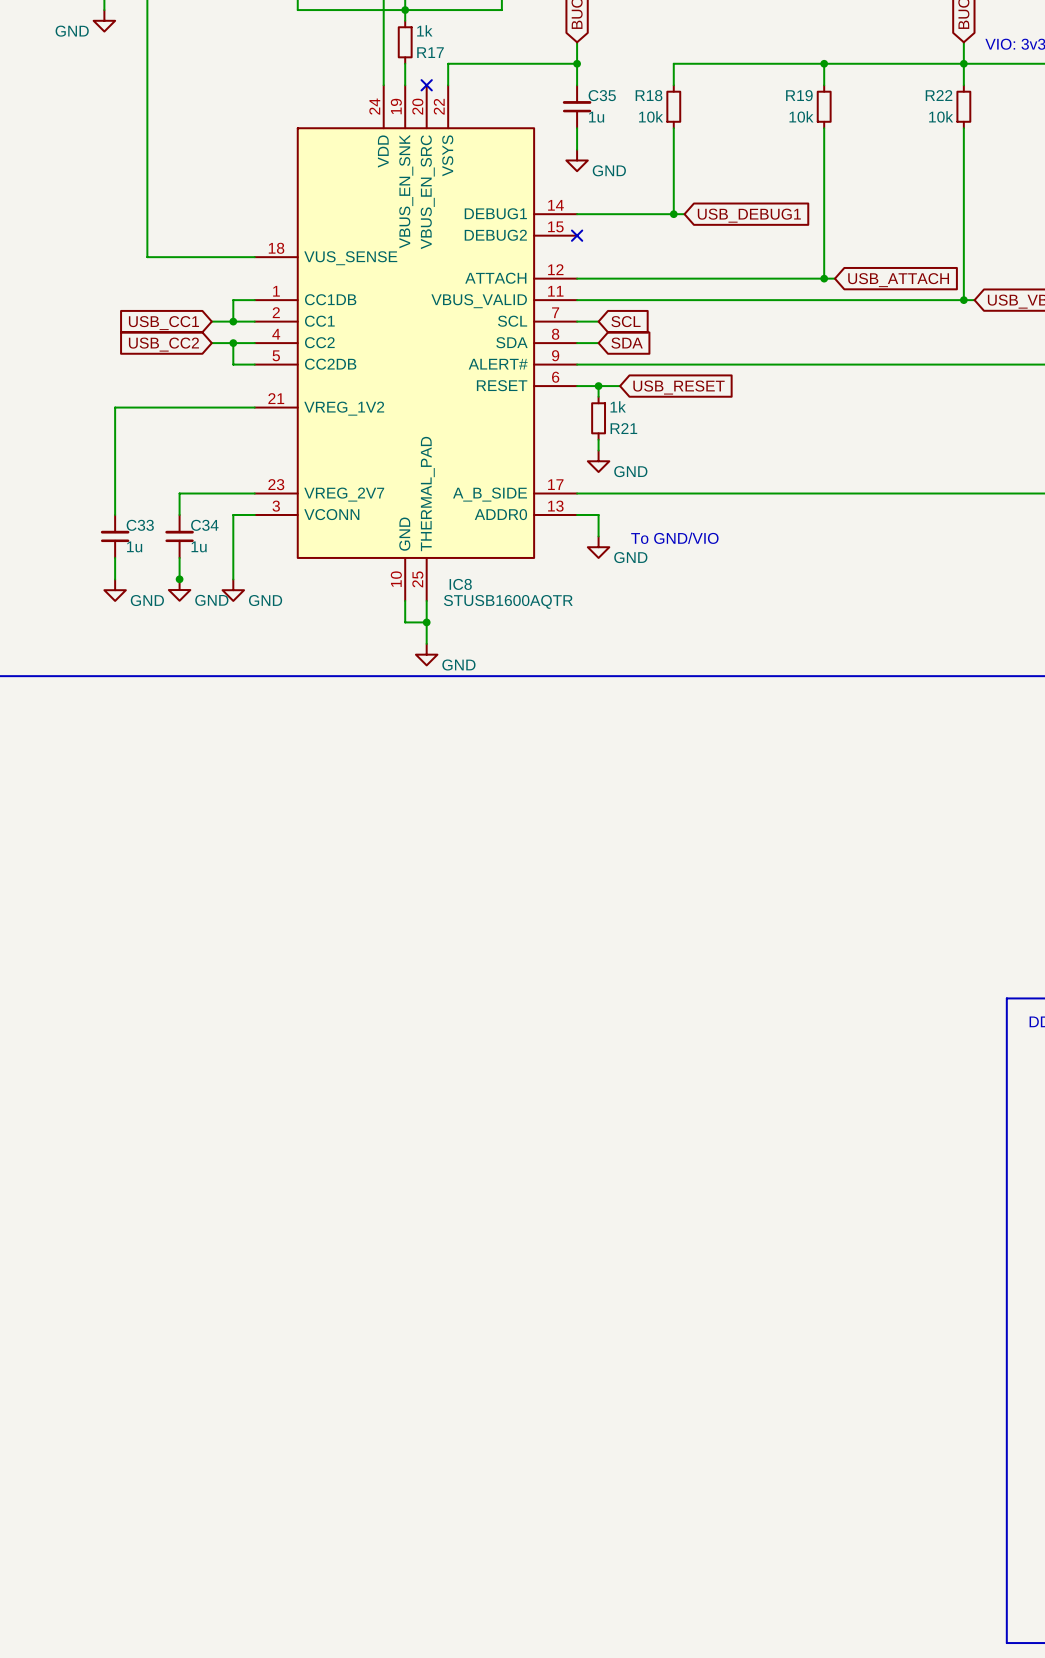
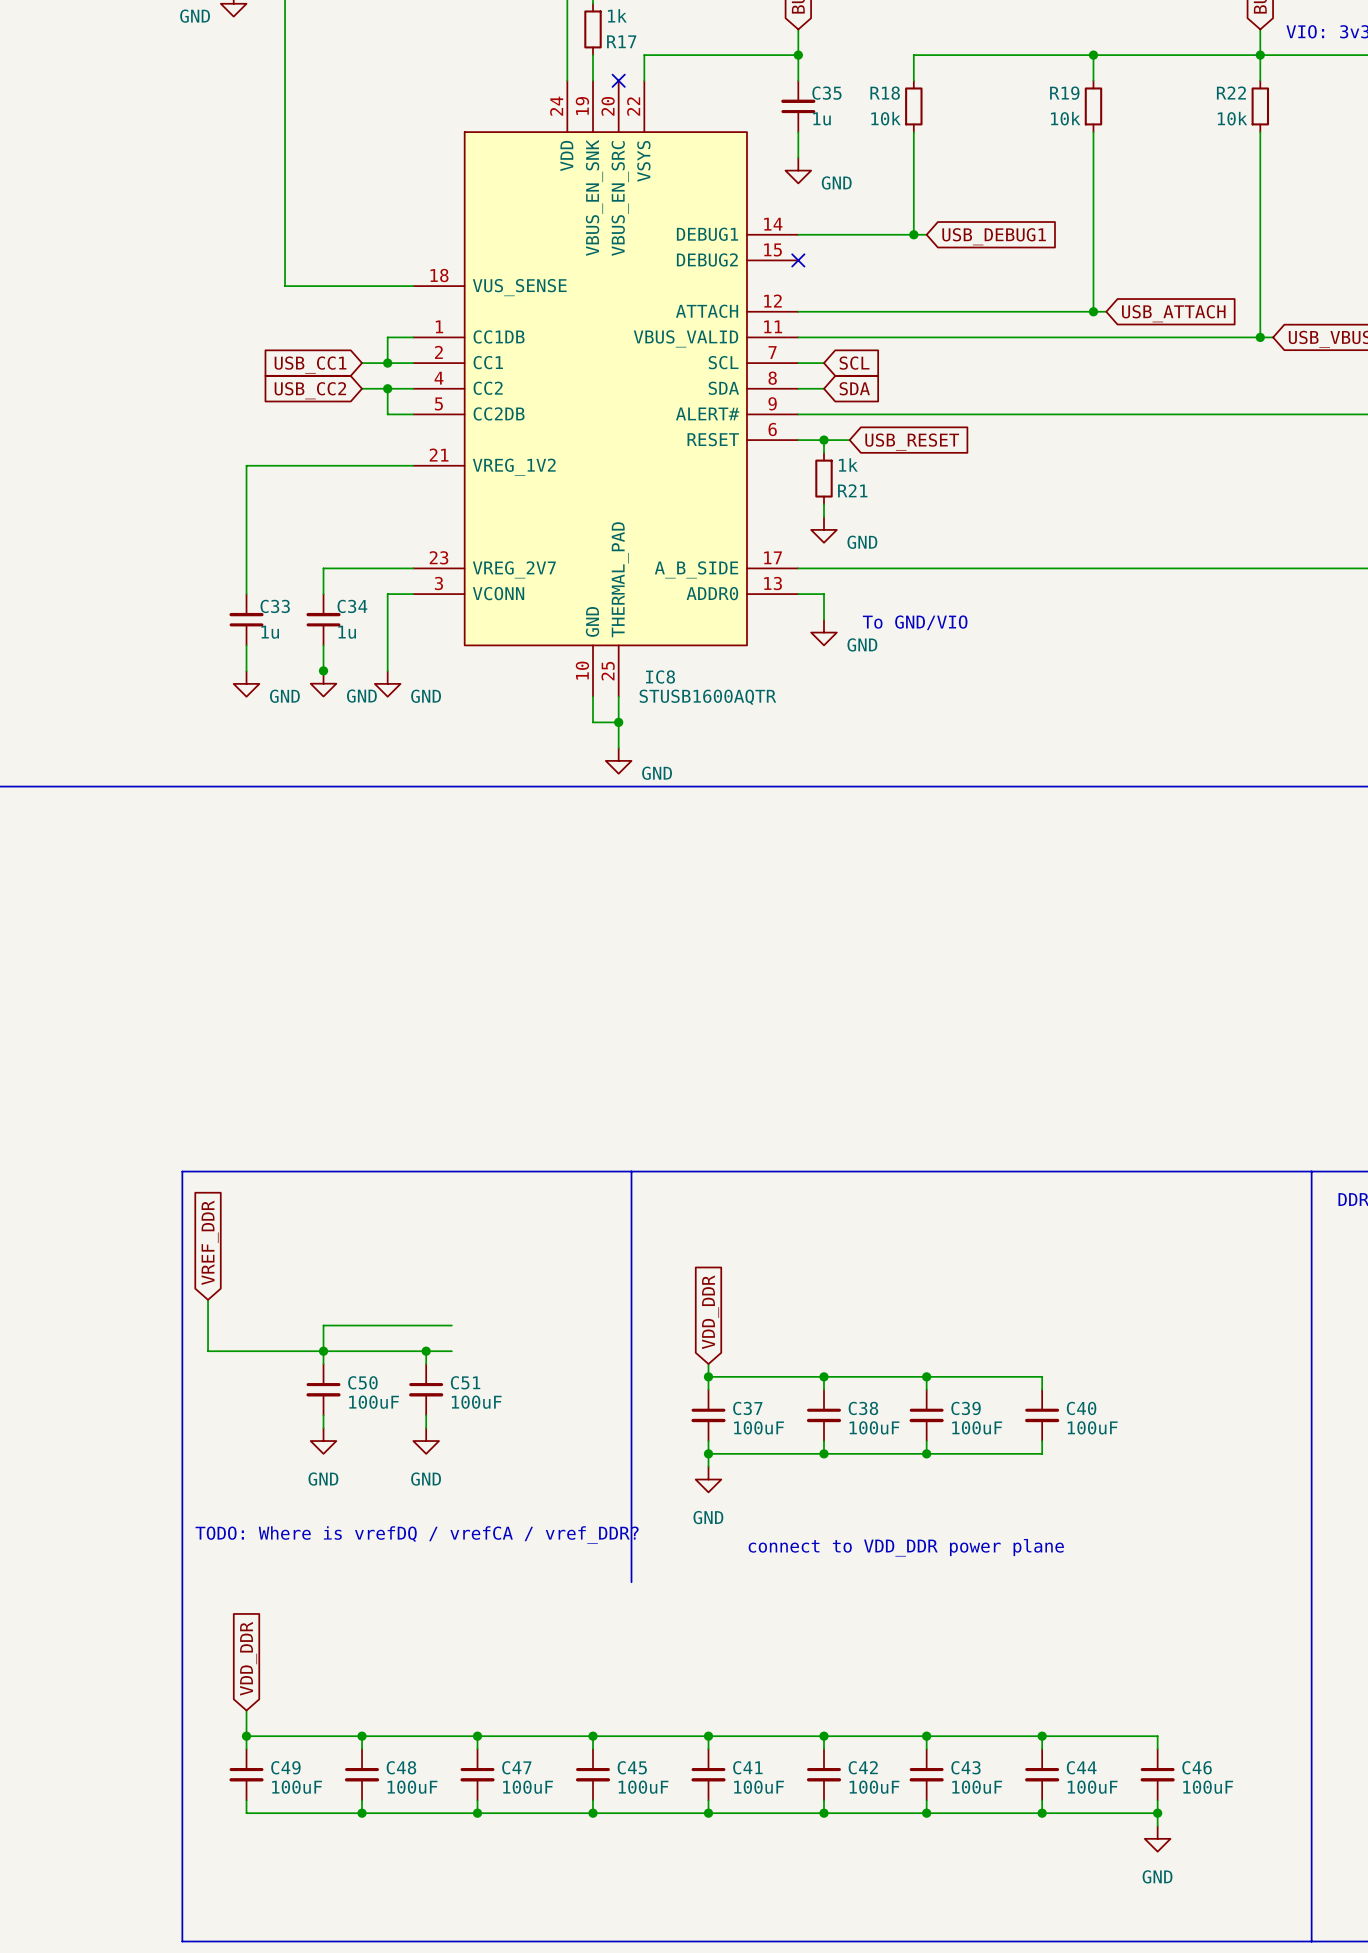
line: none -> (631, 1171) (631, 1582)
line: none -> (1311, 1171) (182, 1171) (182, 1941) (1311, 1941)
global label: none -> VREF_DDR (210, 1242)
wire: none -> (208, 1299) (208, 1351) (451, 1351)
global label: none -> VDD_DDR (710, 1312)
wire: none -> (451, 1325) (323, 1325) (323, 1364)
junction: none -> (323, 1351)
wire: none -> (426, 1351) (426, 1364)
junction: none -> (426, 1351)
wire: none -> (708, 1364) (708, 1389)
wire: none -> (708, 1376) (1042, 1376) (1042, 1389)
junction: none -> (708, 1376)
wire: none -> (823, 1376) (823, 1389)
junction: none -> (823, 1376)
wire: none -> (926, 1376) (926, 1389)
junction: none -> (926, 1376)
C50: none -> 100uF (323, 1389)
C51: none -> 100uF (426, 1389)
wire: none -> (323, 1415) (323, 1428)
wire: none -> (426, 1415) (426, 1428)
C37: none -> 100uF (708, 1415)
C38: none -> 100uF (823, 1415)
C39: none -> 100uF (926, 1415)
C40: none -> 100uF (1042, 1415)
power symbol: none -> GND (323, 1441)
power symbol: none -> GND (426, 1441)
wire: none -> (708, 1441) (708, 1466)
wire: none -> (823, 1441) (823, 1453)
wire: none -> (926, 1441) (926, 1453)
wire: none -> (1042, 1441) (1042, 1453) (708, 1453)
junction: none -> (708, 1453)
junction: none -> (823, 1453)
junction: none -> (926, 1453)
power symbol: none -> GND (708, 1479)
text: none -> TODO: Where is vrefDQ / vrefCA / vref_DDR? (417, 1534)
text: none -> connect to VDD_DDR power plane (906, 1547)
global label: none -> VDD_DDR (248, 1658)
wire: none -> (246, 1710) (246, 1749)
wire: none -> (246, 1736) (1157, 1736) (1157, 1749)
junction: none -> (246, 1736)
wire: none -> (362, 1736) (362, 1749)
junction: none -> (362, 1736)
wire: none -> (477, 1736) (477, 1749)
junction: none -> (477, 1736)
wire: none -> (593, 1736) (593, 1749)
junction: none -> (593, 1736)
wire: none -> (708, 1736) (708, 1749)
junction: none -> (708, 1736)
wire: none -> (823, 1736) (823, 1749)
junction: none -> (823, 1736)
wire: none -> (926, 1736) (926, 1749)
junction: none -> (926, 1736)
wire: none -> (1042, 1736) (1042, 1749)
junction: none -> (1042, 1736)
C49: none -> 100uF (246, 1774)
C48: none -> 100uF (362, 1774)
C47: none -> 100uF (477, 1774)
C45: none -> 100uF (593, 1774)
C41: none -> 100uF (708, 1774)
C42: none -> 100uF (823, 1774)
C43: none -> 100uF (926, 1774)
C44: none -> 100uF (1042, 1774)
C46: none -> 100uF (1157, 1774)
wire: none -> (246, 1800) (246, 1813) (1157, 1813)
wire: none -> (362, 1800) (362, 1813)
wire: none -> (477, 1800) (477, 1813)
wire: none -> (593, 1800) (593, 1813)
wire: none -> (708, 1800) (708, 1813)
wire: none -> (823, 1800) (823, 1813)
wire: none -> (926, 1800) (926, 1813)
wire: none -> (1042, 1800) (1042, 1813)
wire: none -> (1157, 1800) (1157, 1826)
junction: none -> (362, 1813)
junction: none -> (477, 1813)
junction: none -> (593, 1813)
junction: none -> (708, 1813)
junction: none -> (823, 1813)
junction: none -> (926, 1813)
junction: none -> (1042, 1813)
junction: none -> (1157, 1813)
power symbol: none -> GND (1157, 1838)

